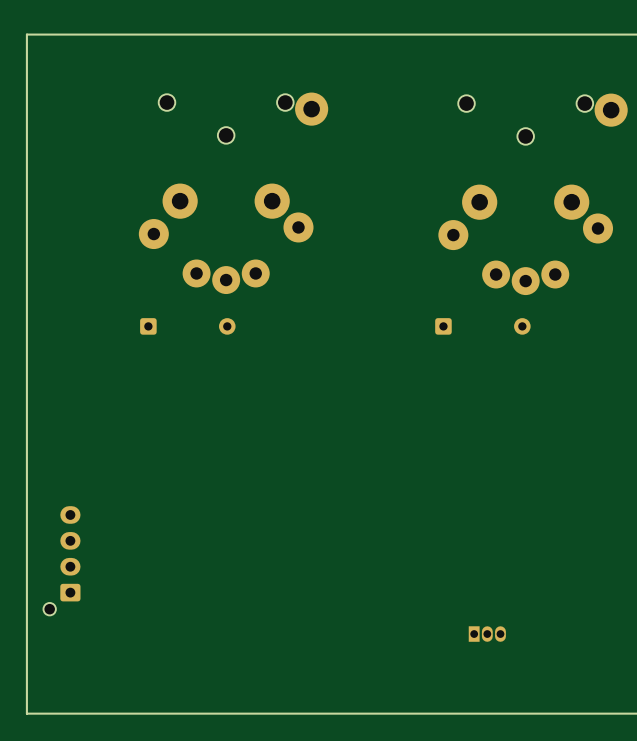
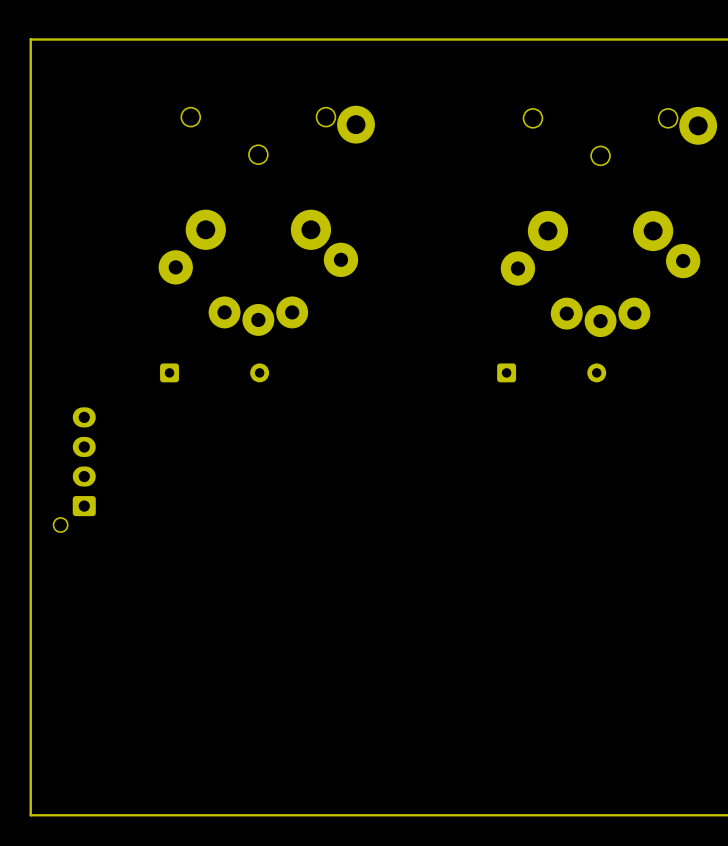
part position: (61, 560) -> (74, 469)
part: (487, 634) -> none

